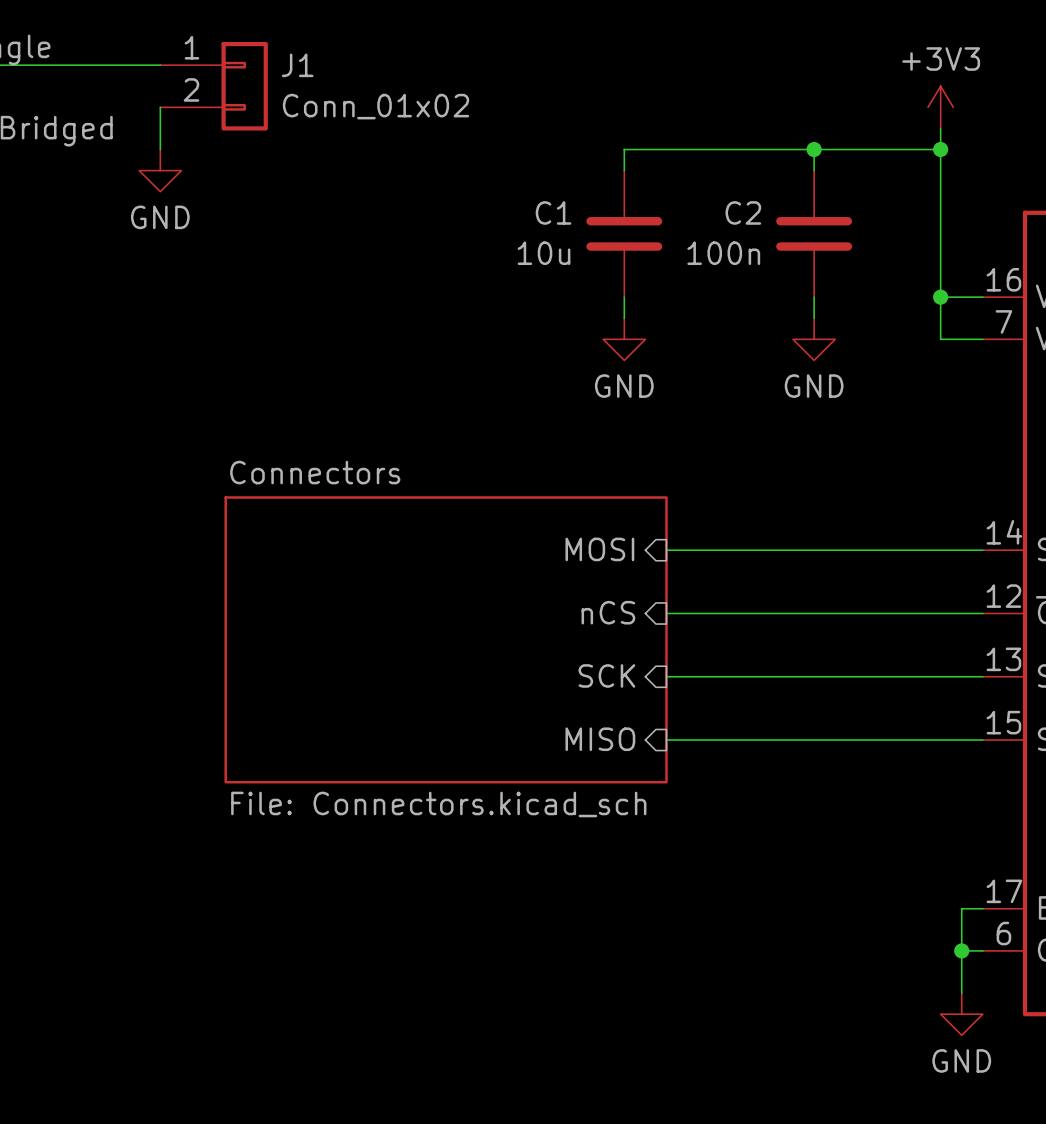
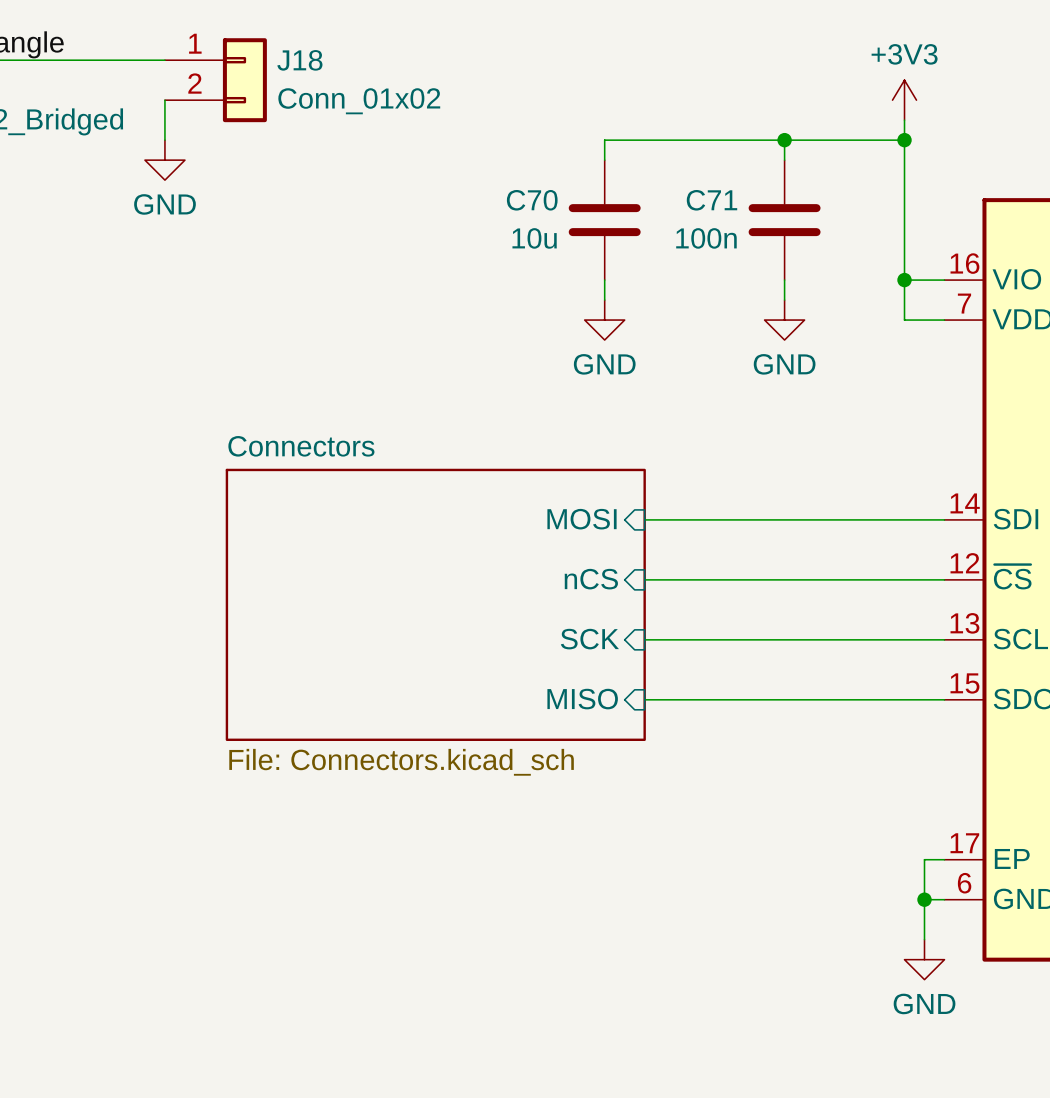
J1 name: J1 (297, 65) -> J18 (299, 60)
C1 name: C1 (553, 212) -> C70 (532, 200)
C2 name: C2 (743, 212) -> C71 (711, 200)

